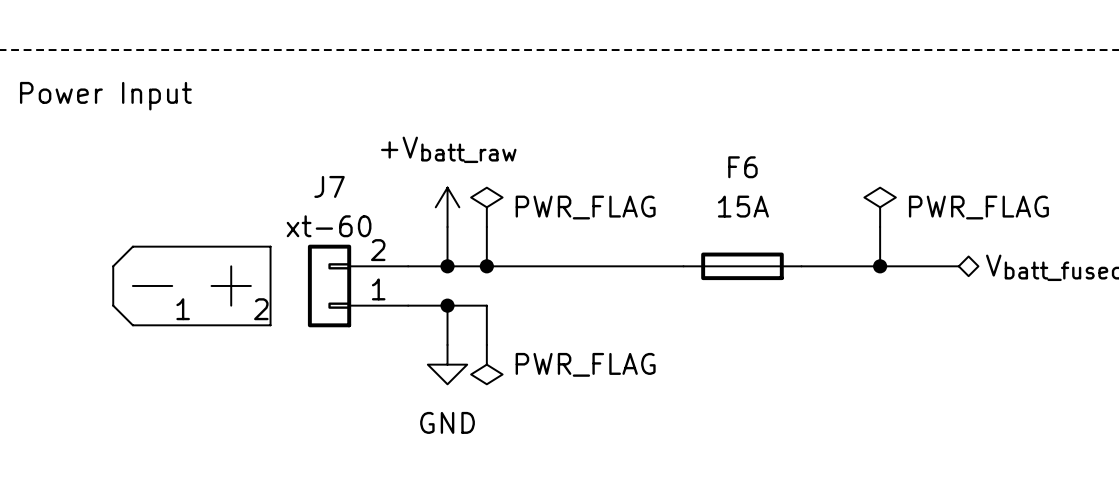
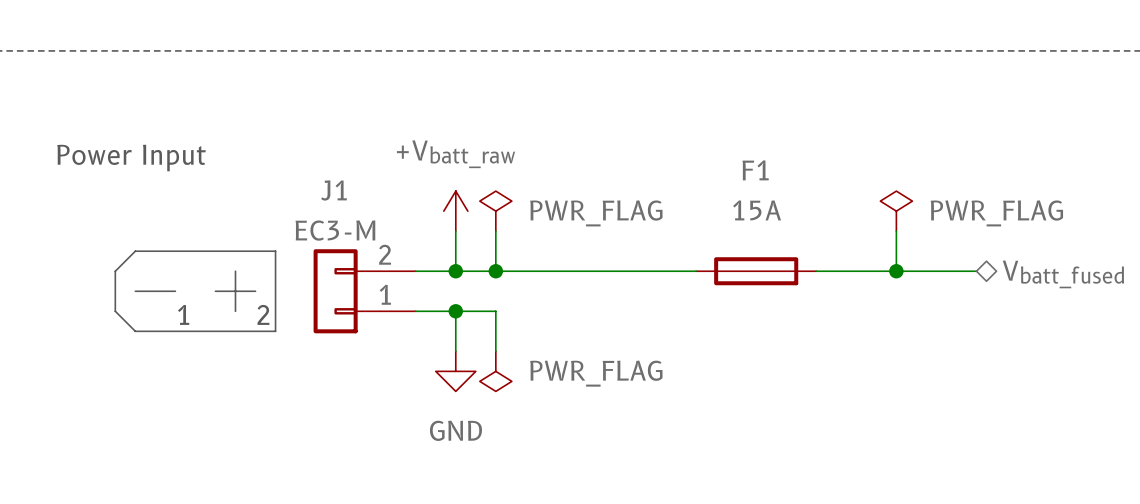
text position: Power Input (105, 96) -> Power Input (131, 157)
F6 name: F6 (742, 167) -> F1 (755, 170)
J7 name: J7 (329, 186) -> J1 (333, 190)
J7 value: xt-60 (329, 226) -> EC3-M (335, 230)

